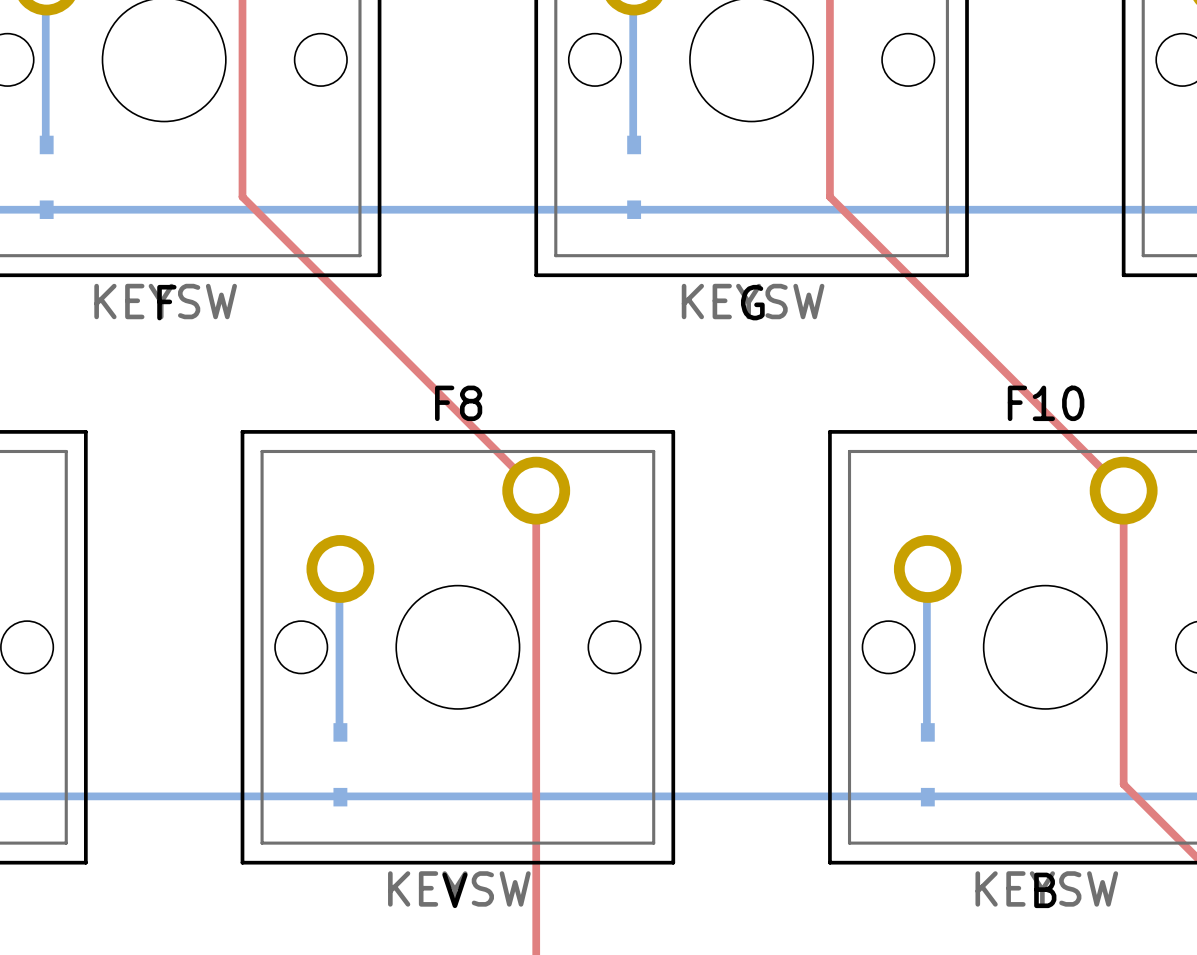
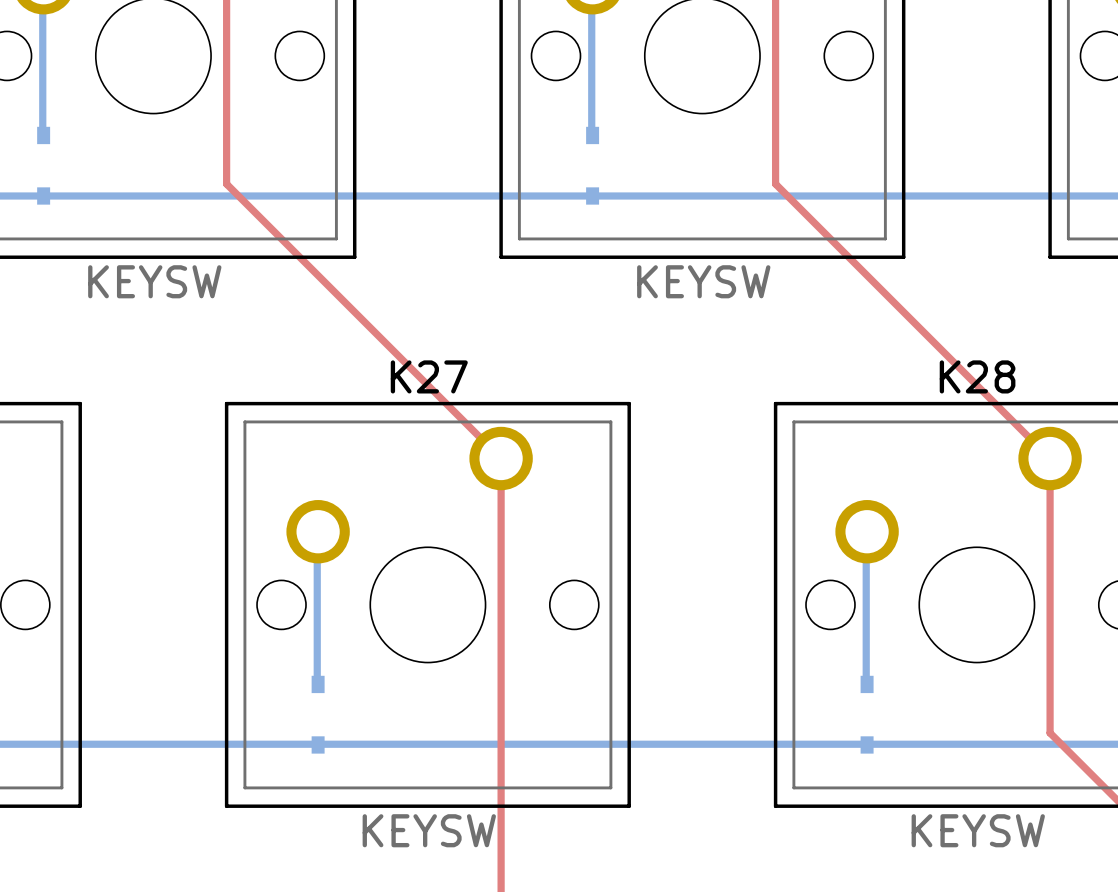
text: F (166, 302) -> none
text: G (752, 302) -> none
F8 name: F8 (458, 403) -> K27 (429, 376)
F10 name: F10 (1046, 403) -> K28 (977, 376)
text: V (454, 890) -> none
text: B (1045, 890) -> none

